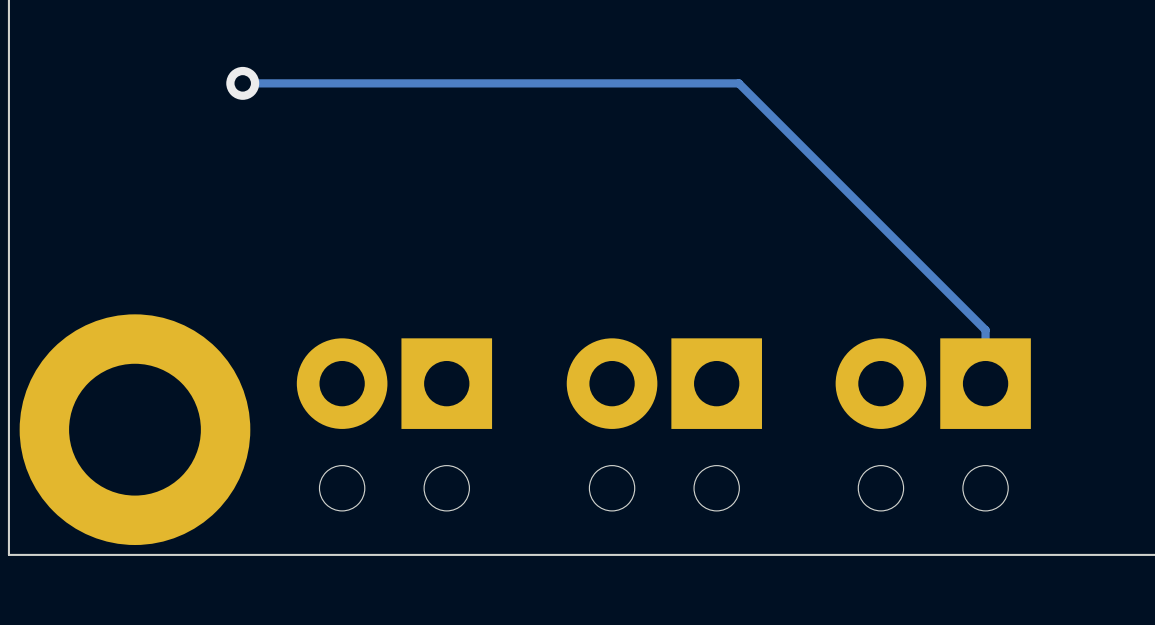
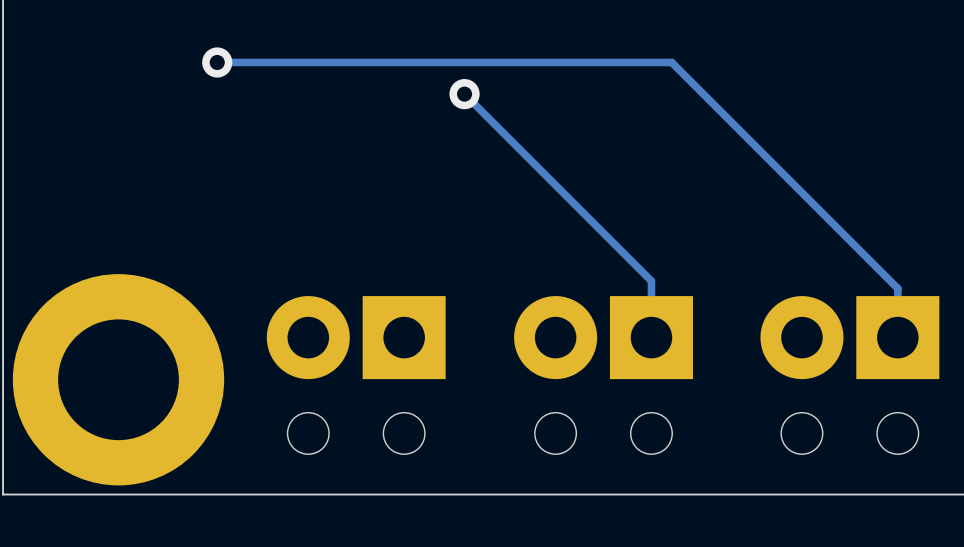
track: none -> (464, 94) (651, 281) (651, 337)
via: none -> (464, 94)

